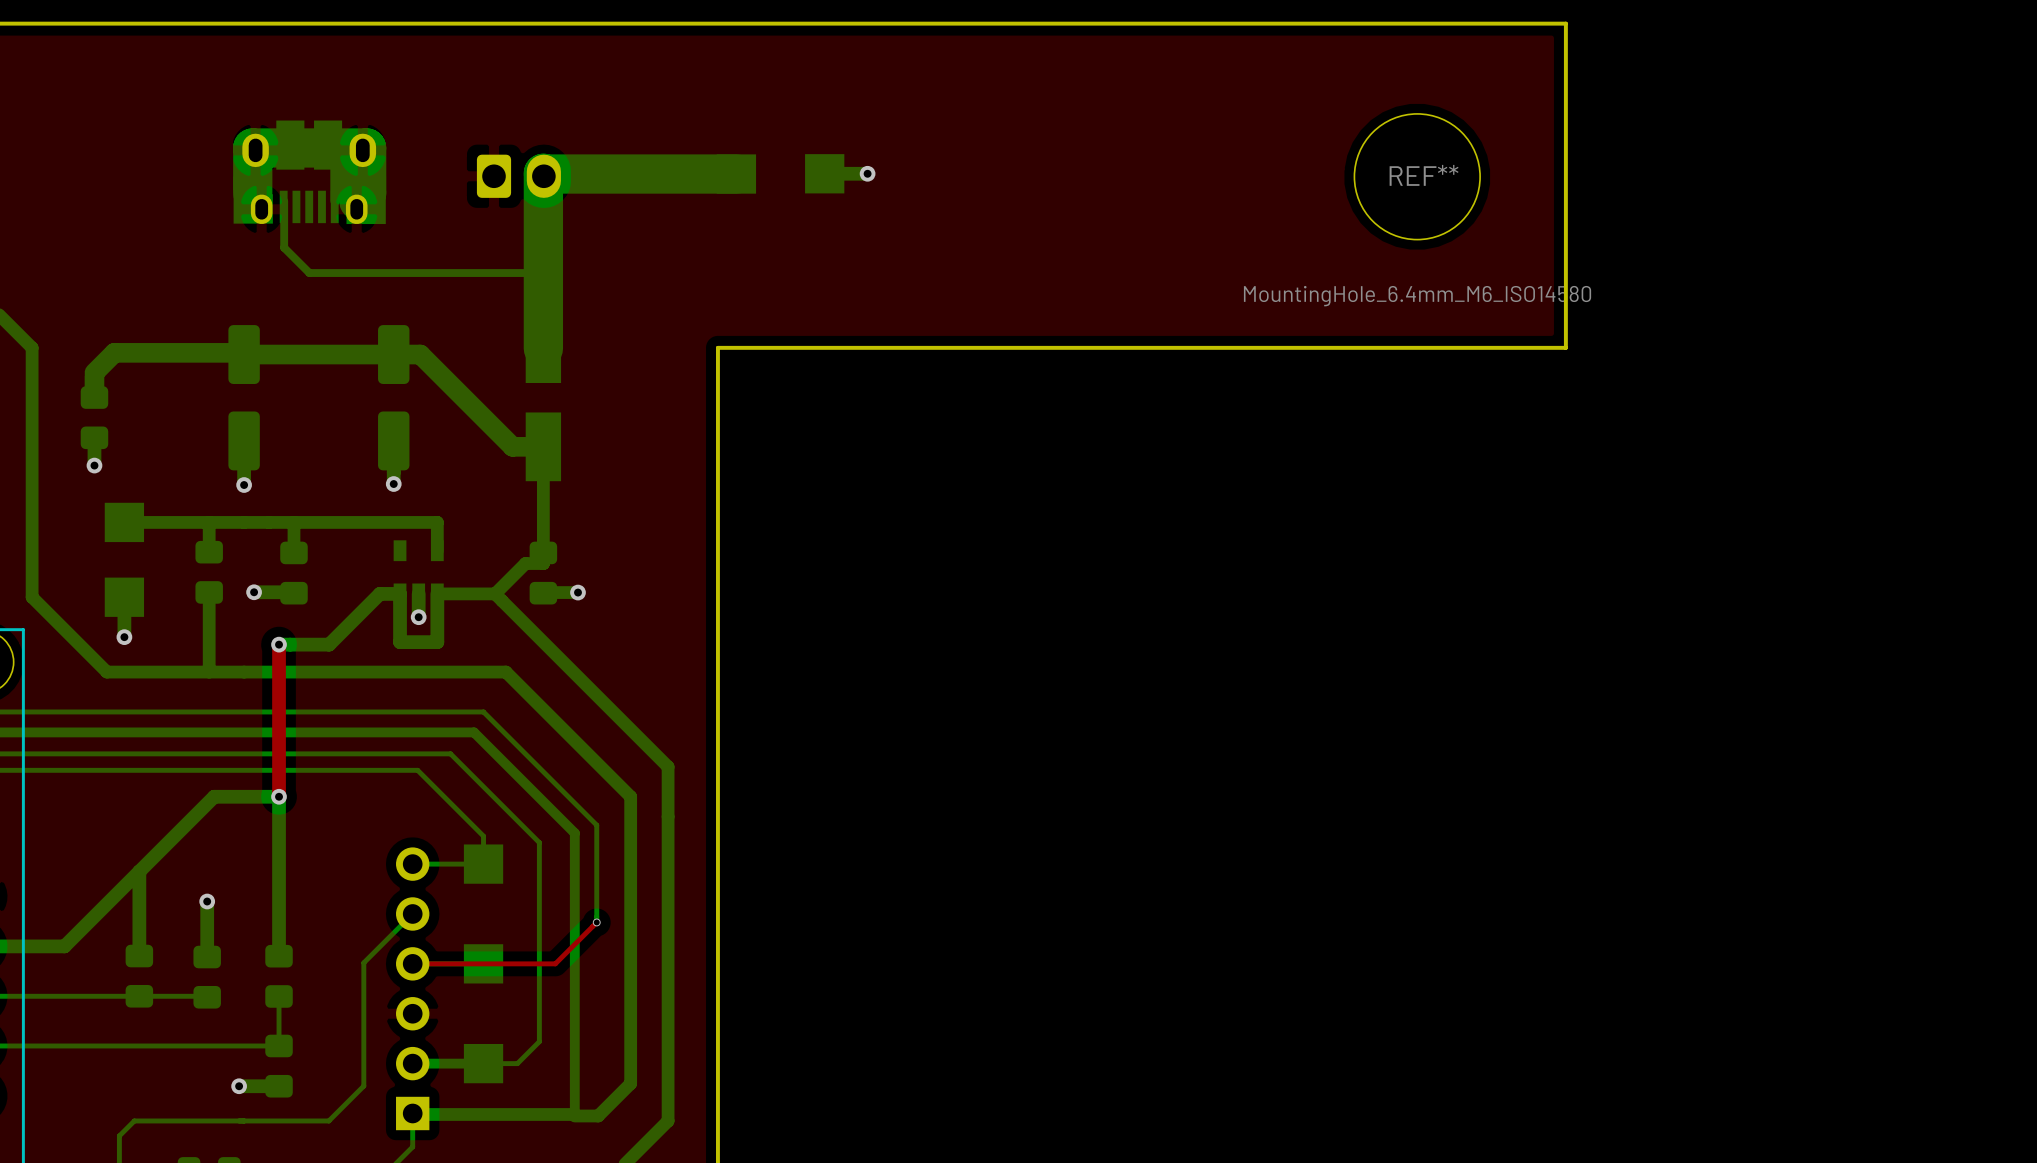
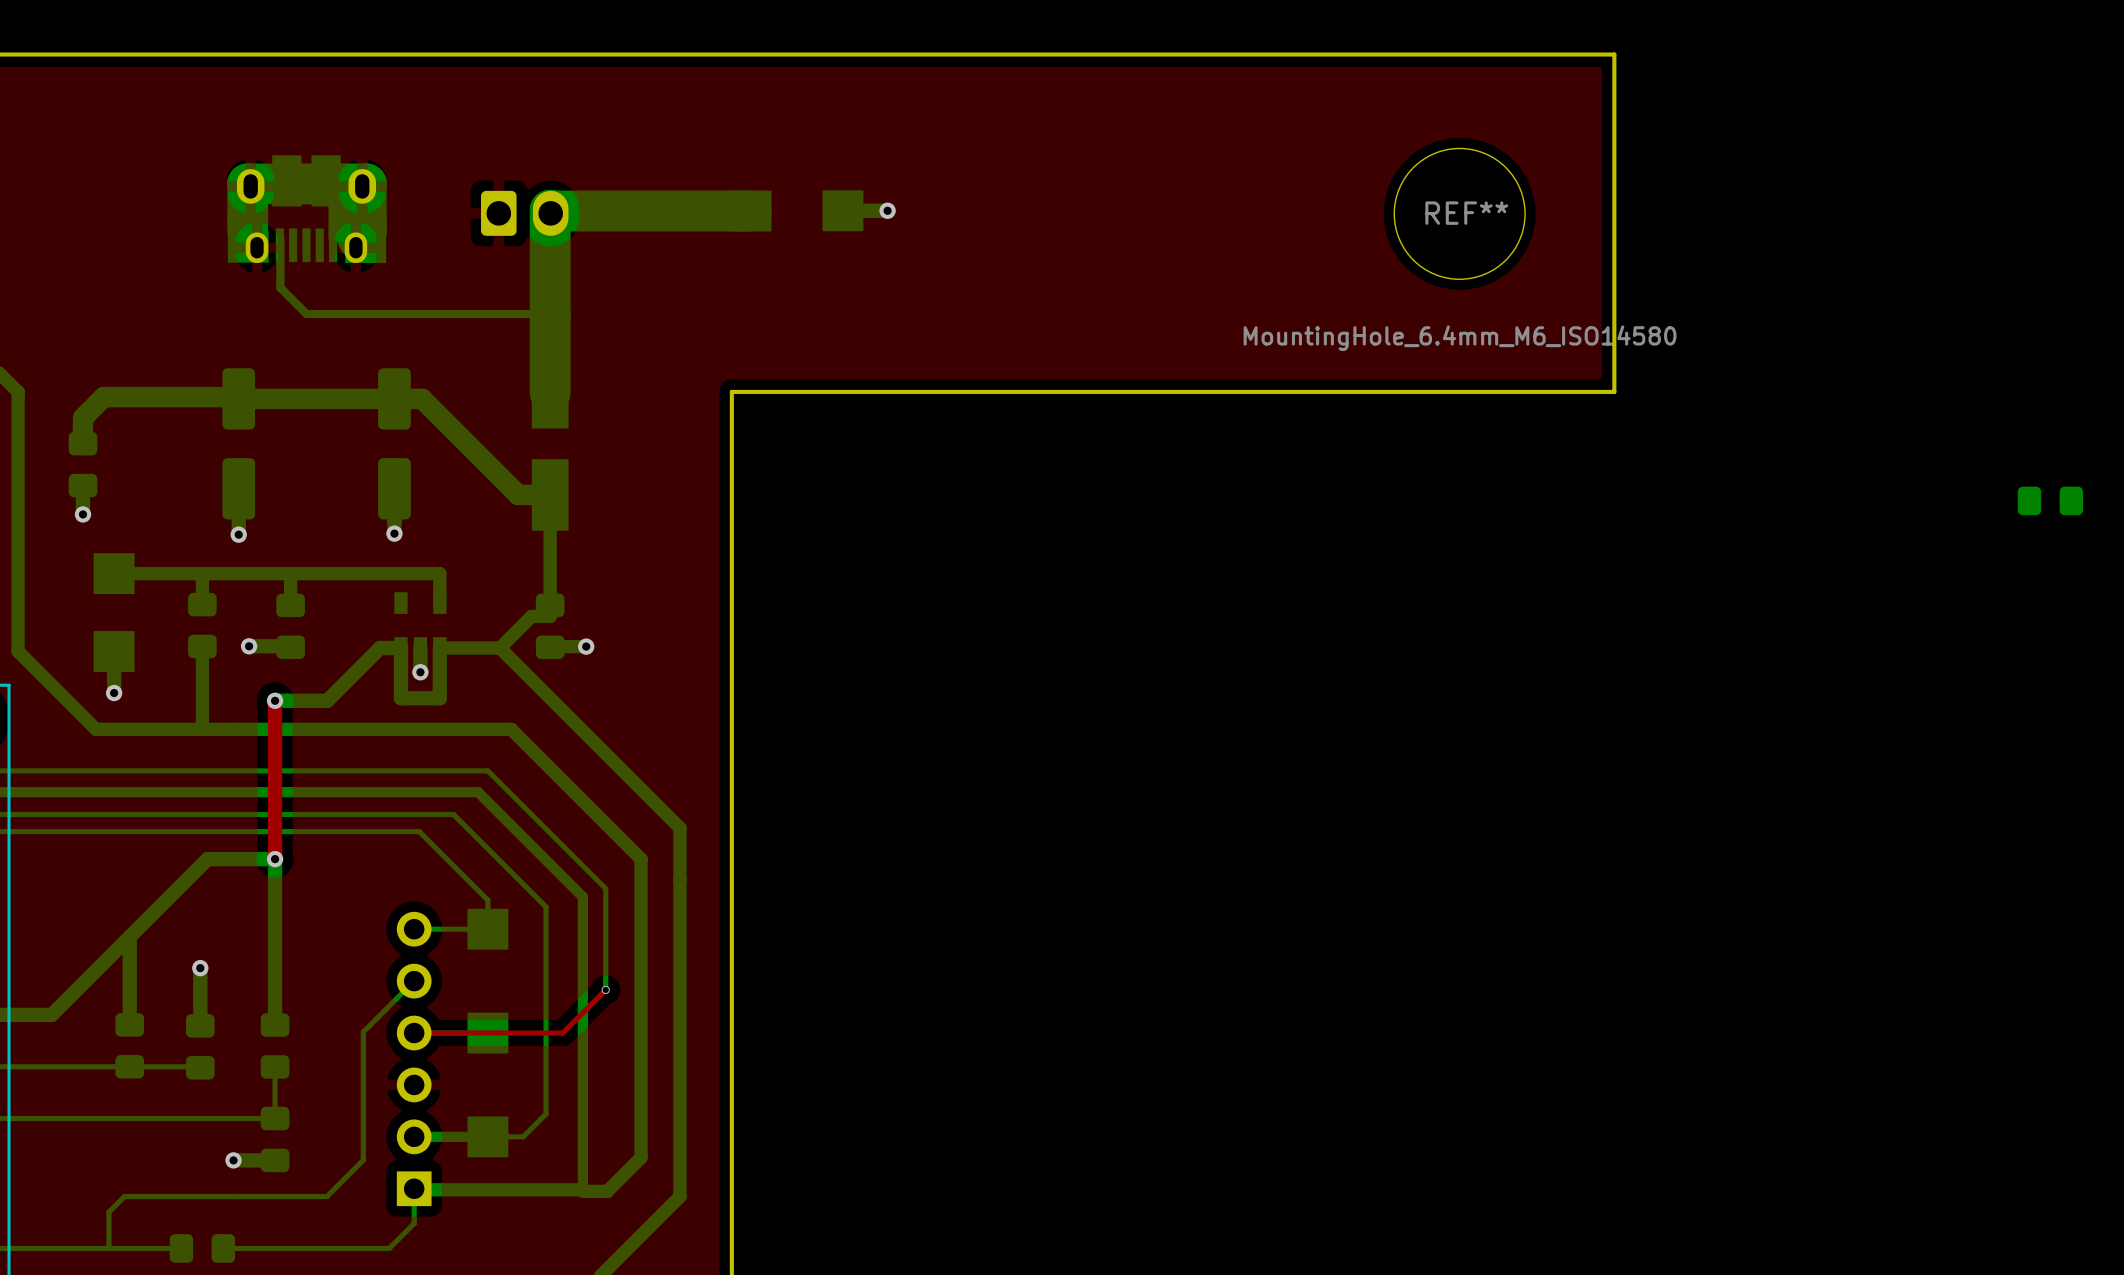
part: none -> (2050, 500)

